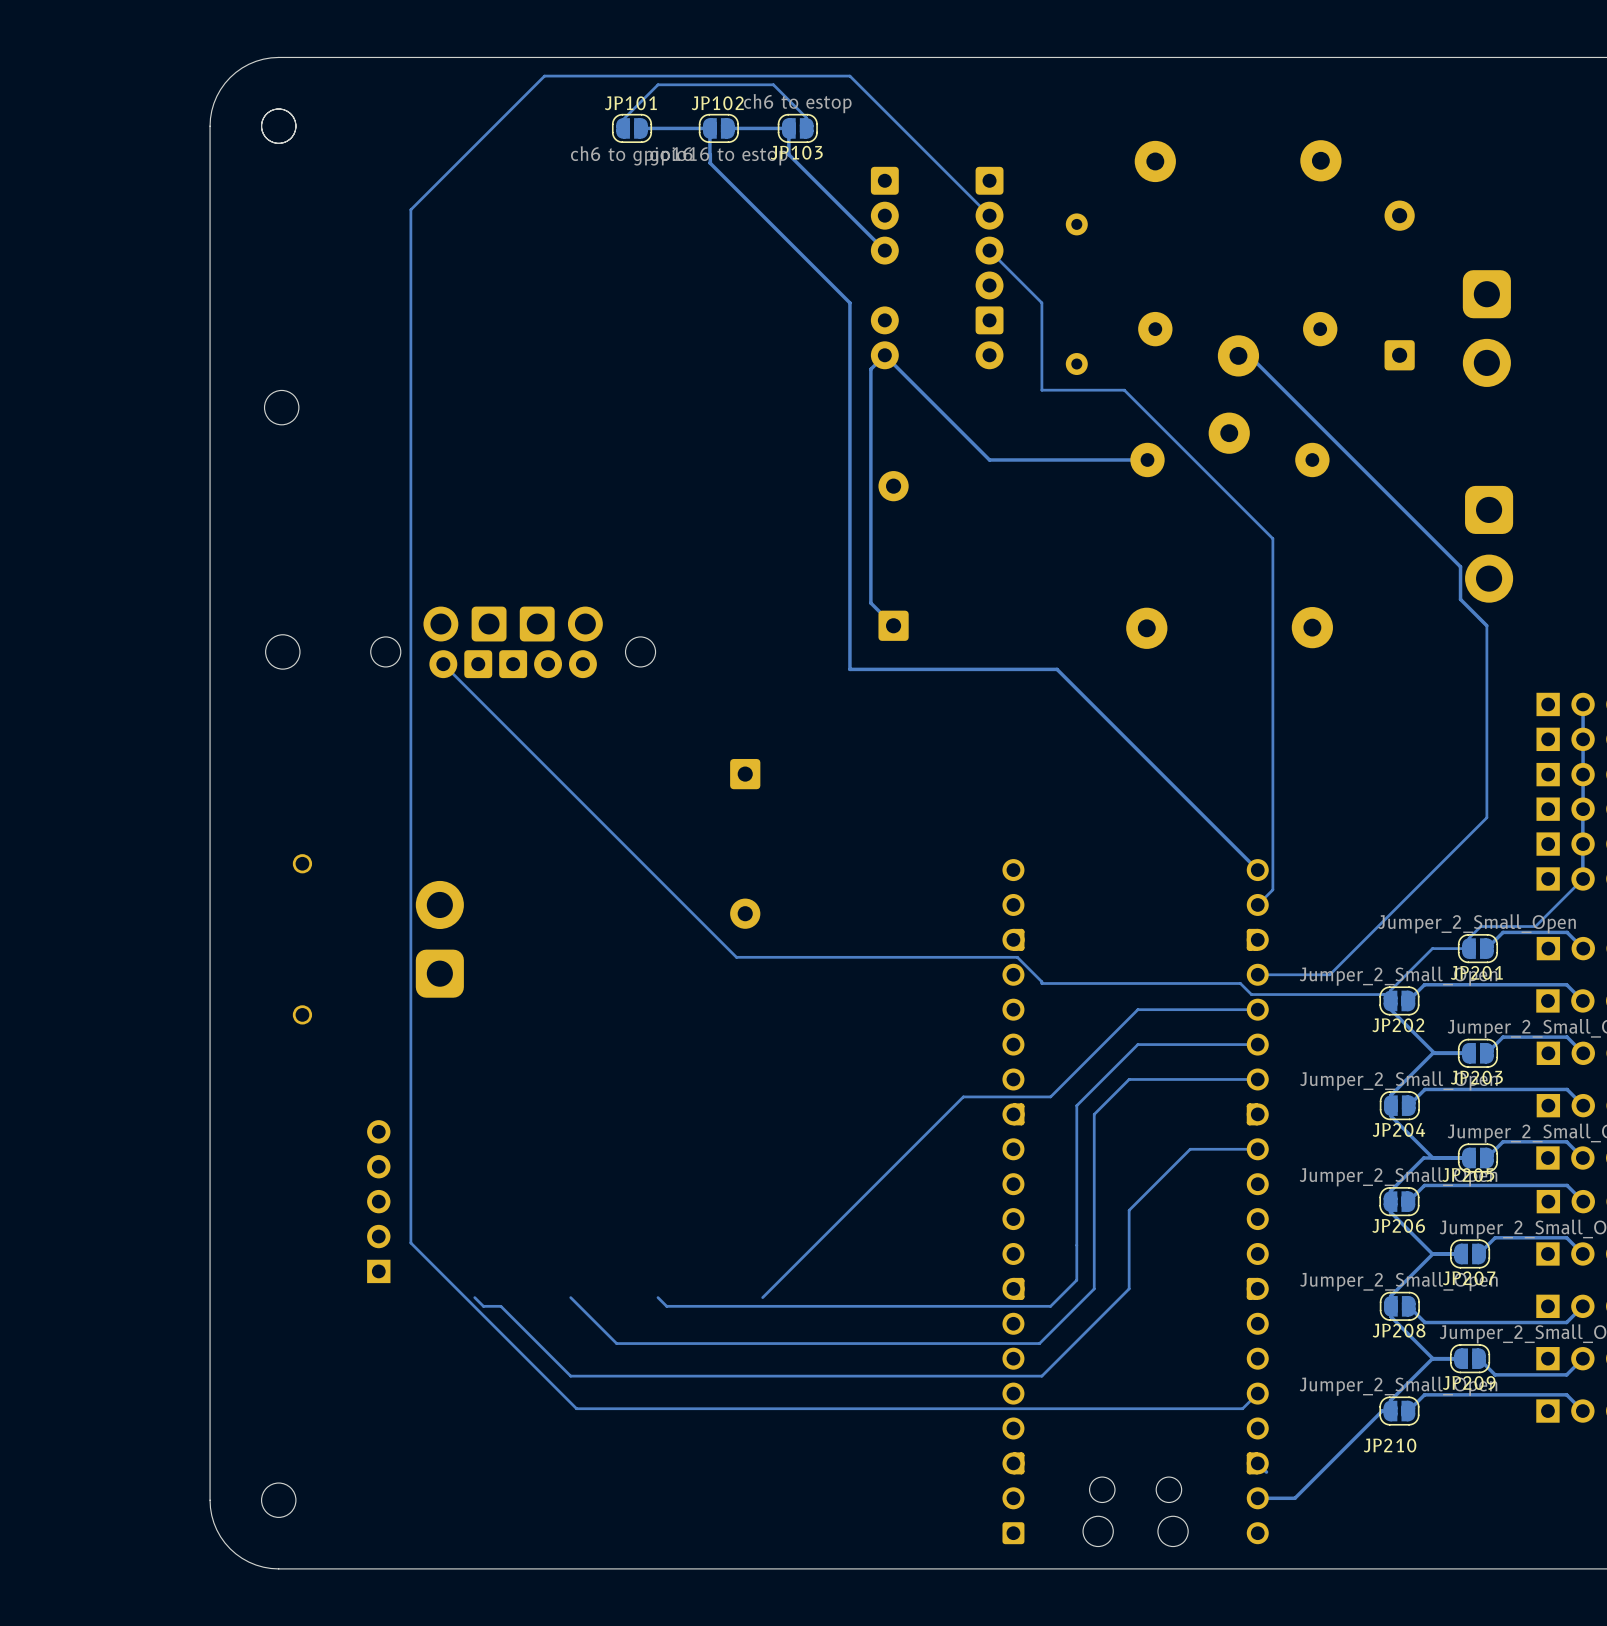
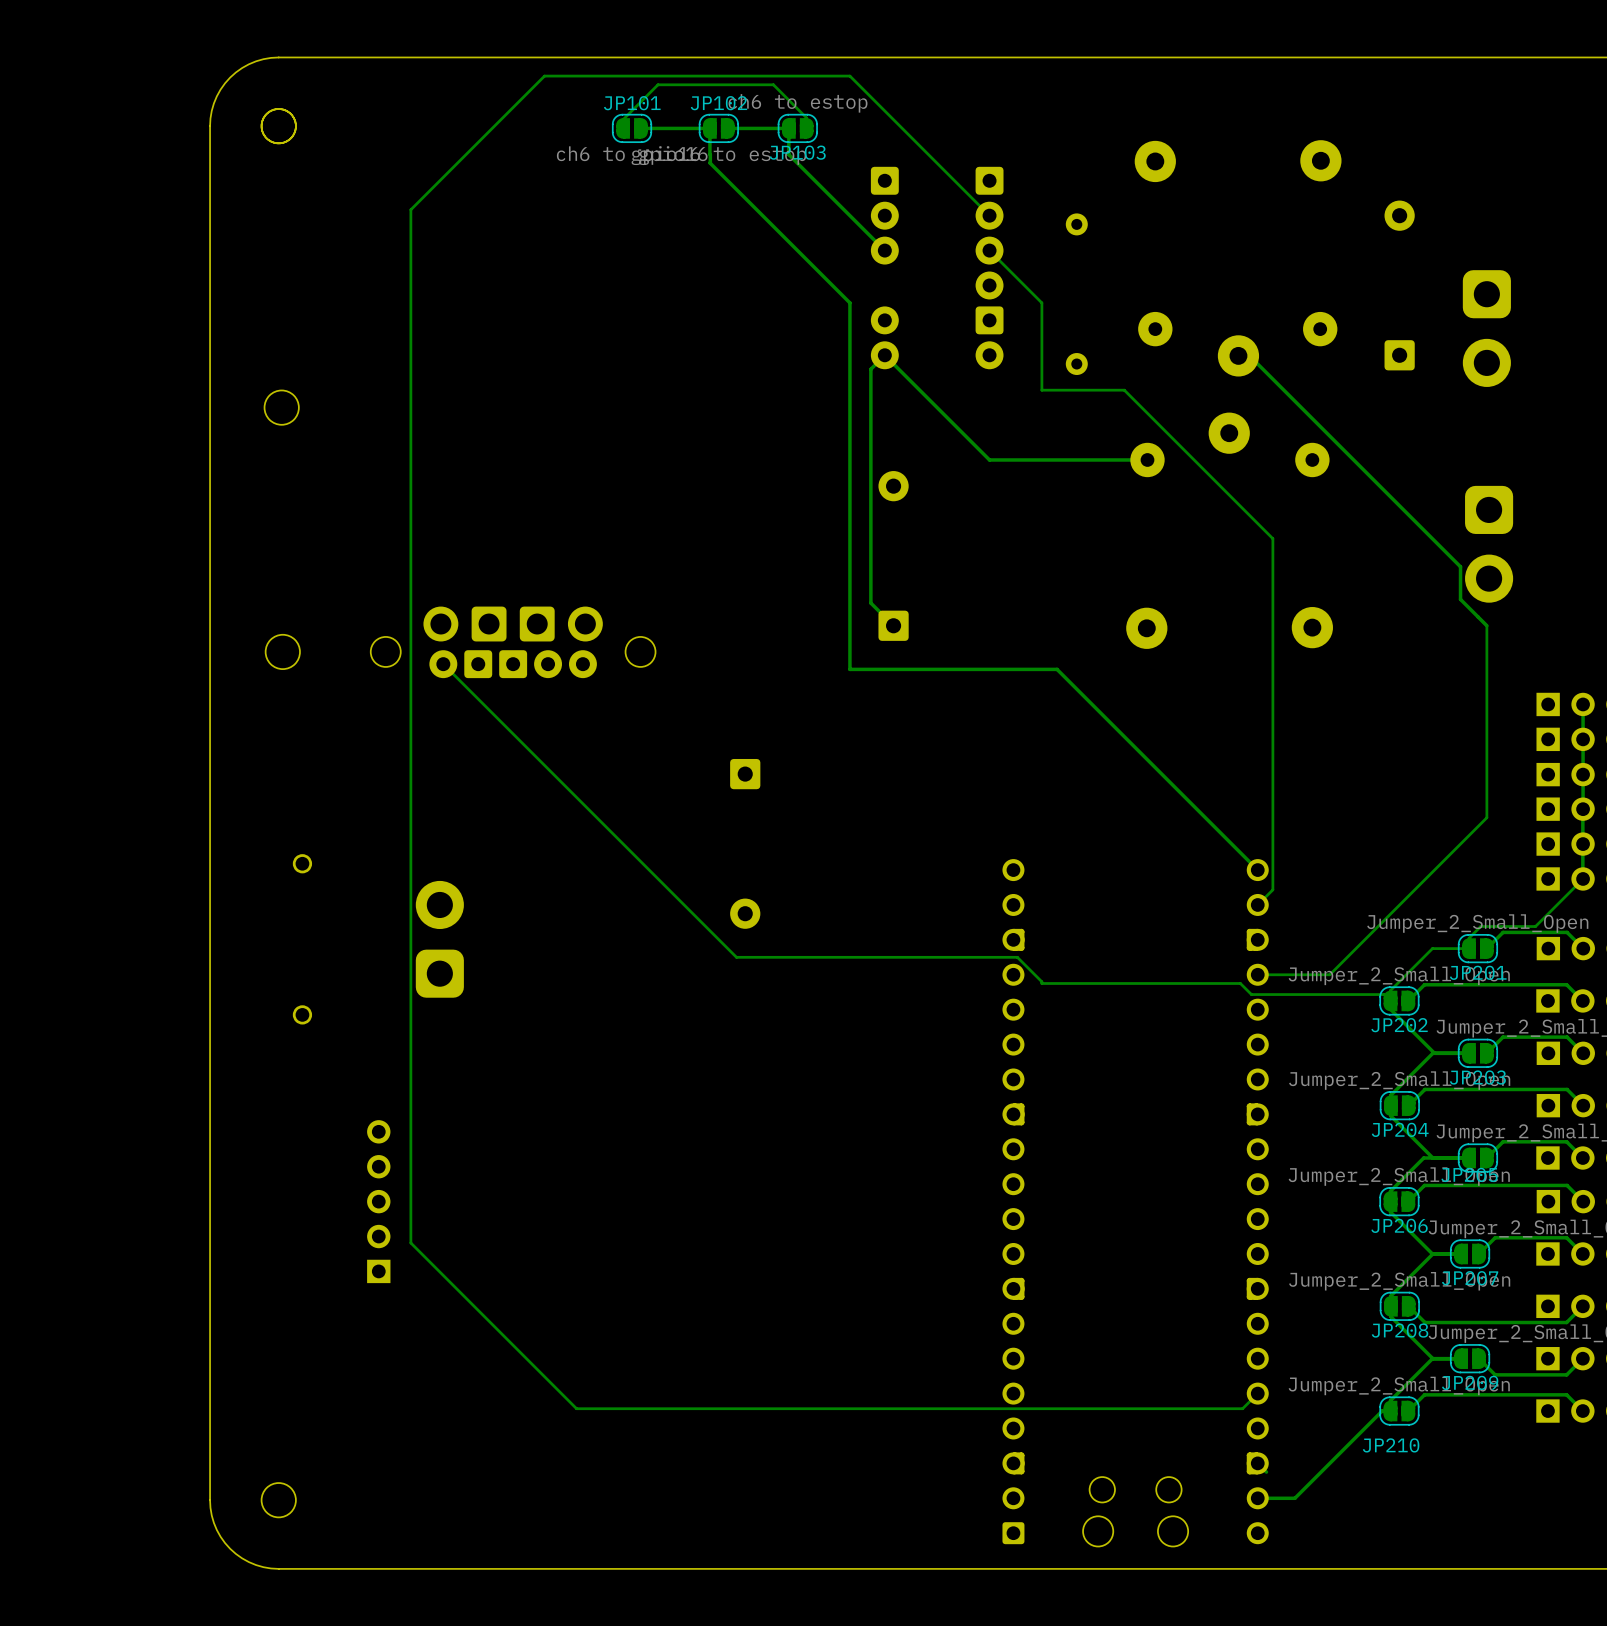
track: (1257, 1009) (1137, 1009) (1050, 1096) (963, 1096) (762, 1297) -> none
track: (1257, 1044) (1137, 1044) (1076, 1105) (1076, 1280) (1050, 1306) (666, 1306) (657, 1297) -> none
track: (1257, 1079) (1129, 1079) (1094, 1114) (1094, 1288) (1039, 1343) (616, 1343) (570, 1297) -> none
track: (1257, 1149) (1190, 1149) (1129, 1210) (1129, 1288) (1041, 1376) (570, 1376) (500, 1306) (483, 1306) (474, 1297) -> none

